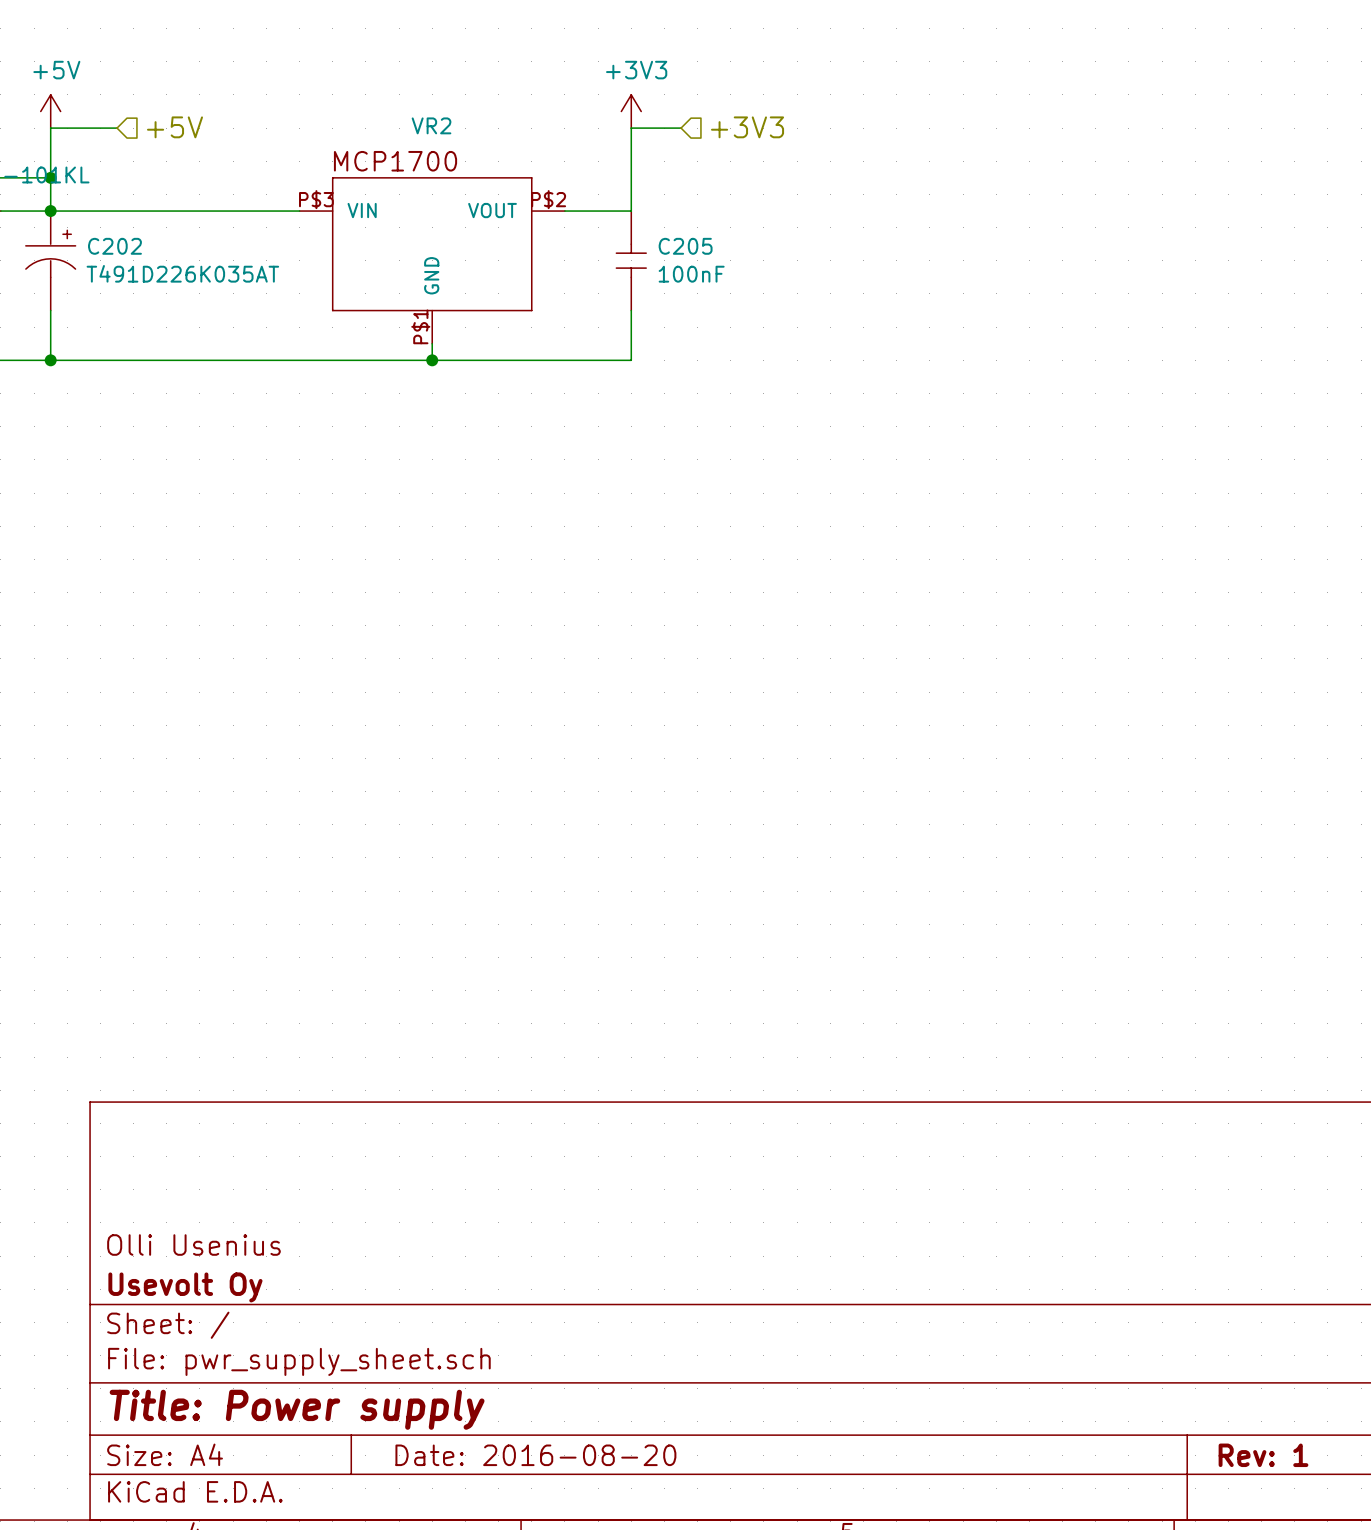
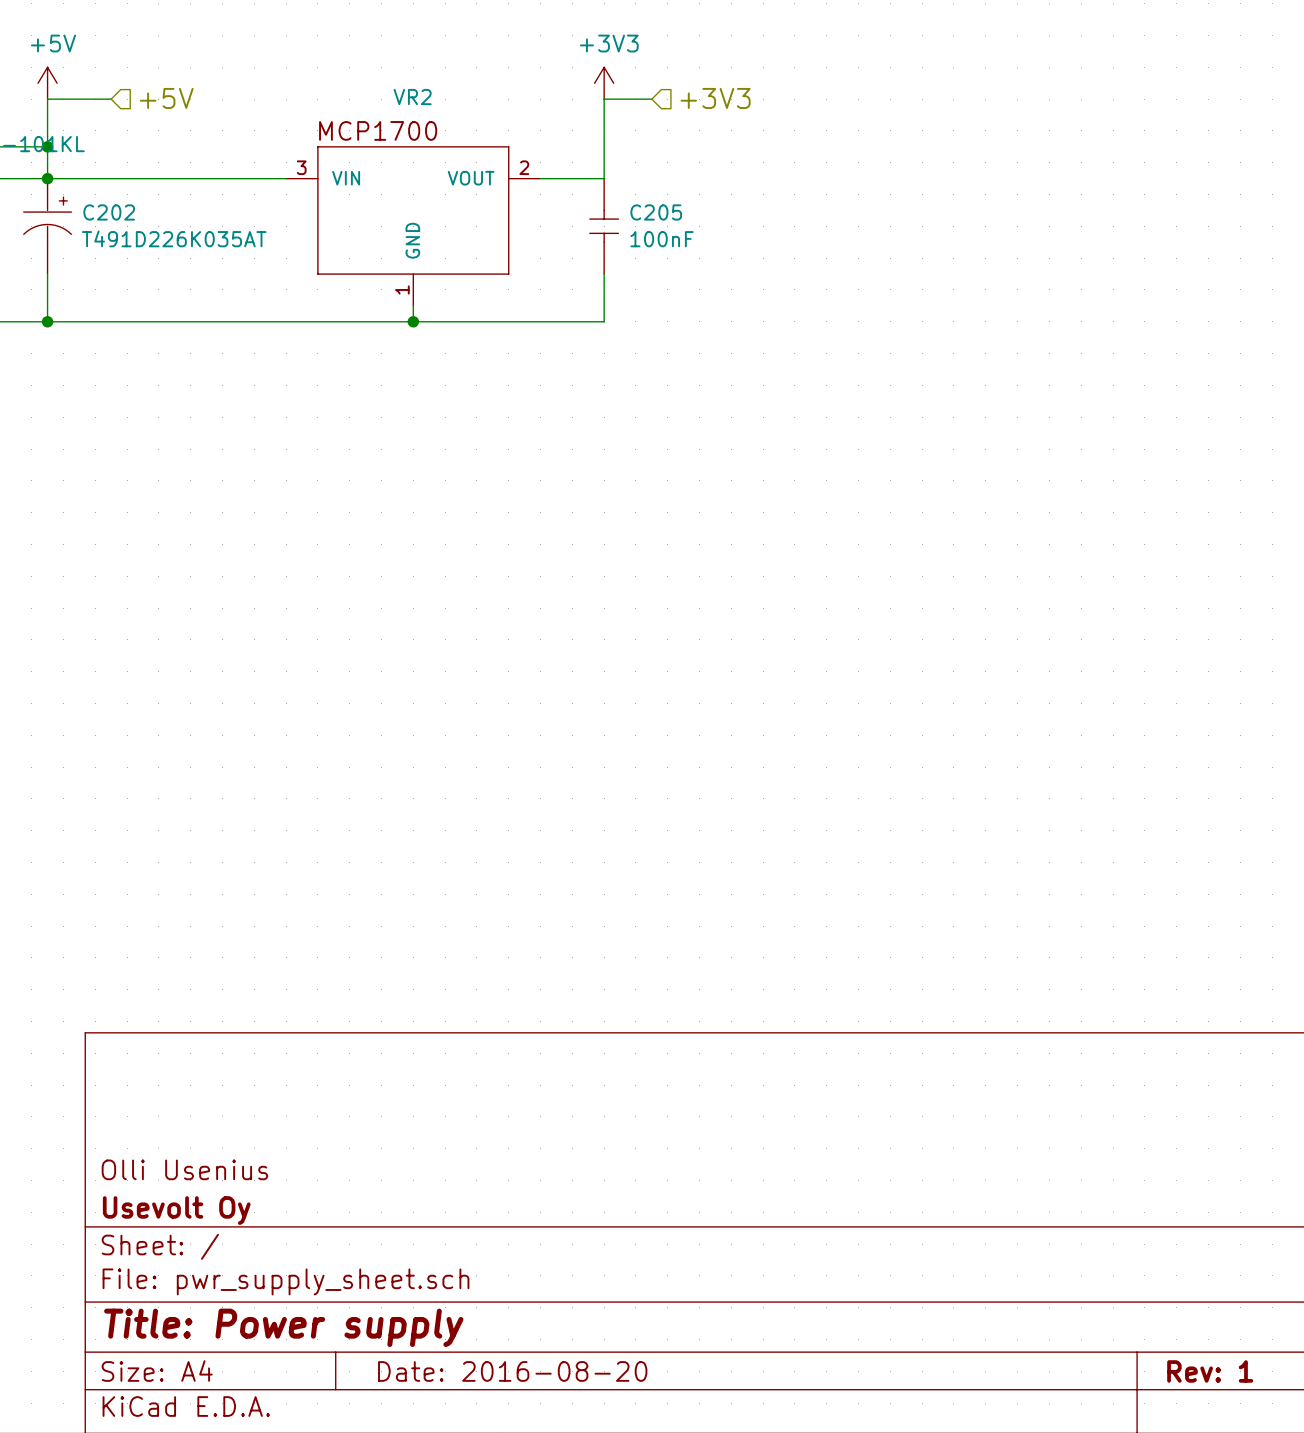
VR2 pin number: P$3 (316, 199) -> 3 (301, 167)
VR2 pin number: P$2 (548, 199) -> 2 (524, 167)
VR2 pin number: P$1 (420, 326) -> 1 (402, 289)

